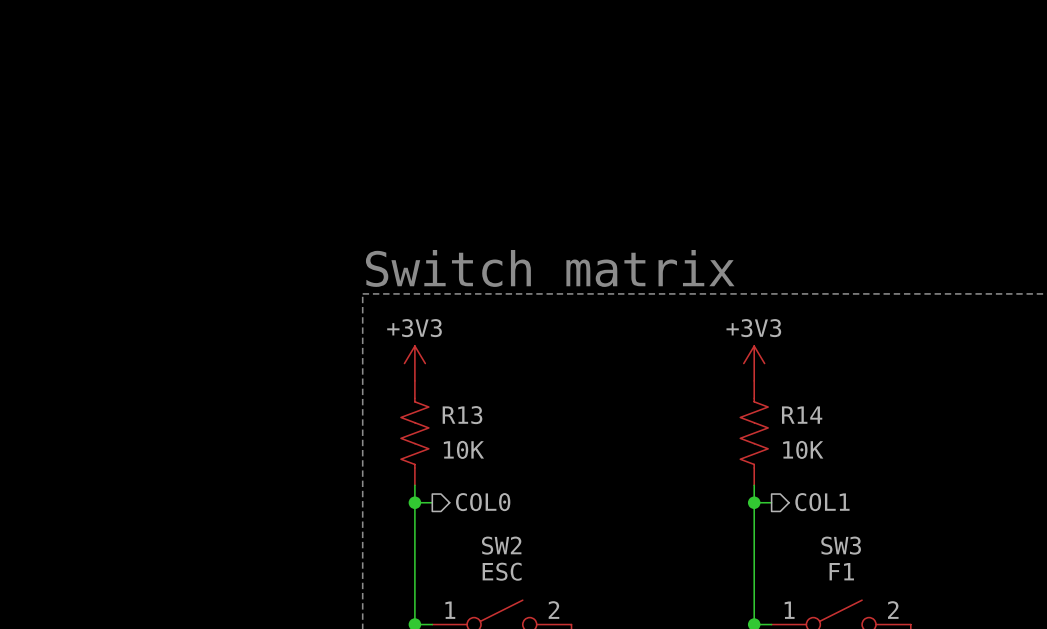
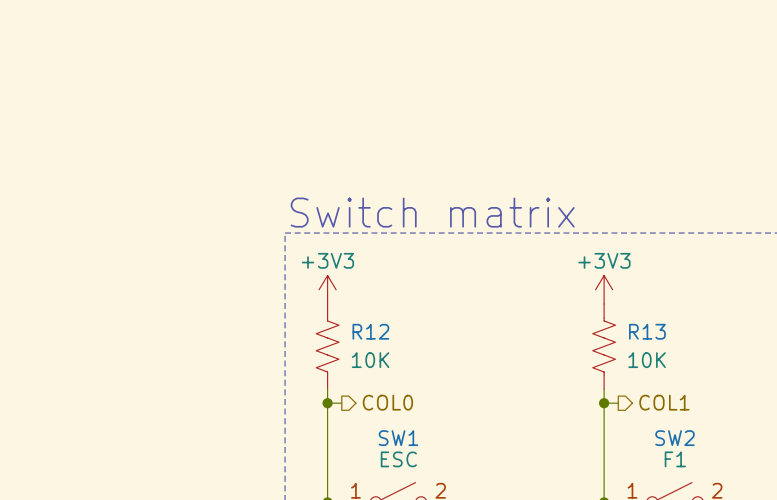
R13 name: R13 (462, 415) -> R12 (370, 331)
R14 name: R14 (802, 415) -> R13 (647, 331)
SW2 name: SW2 (501, 545) -> SW1 (398, 438)
SW3 name: SW3 (841, 545) -> SW2 (675, 438)

